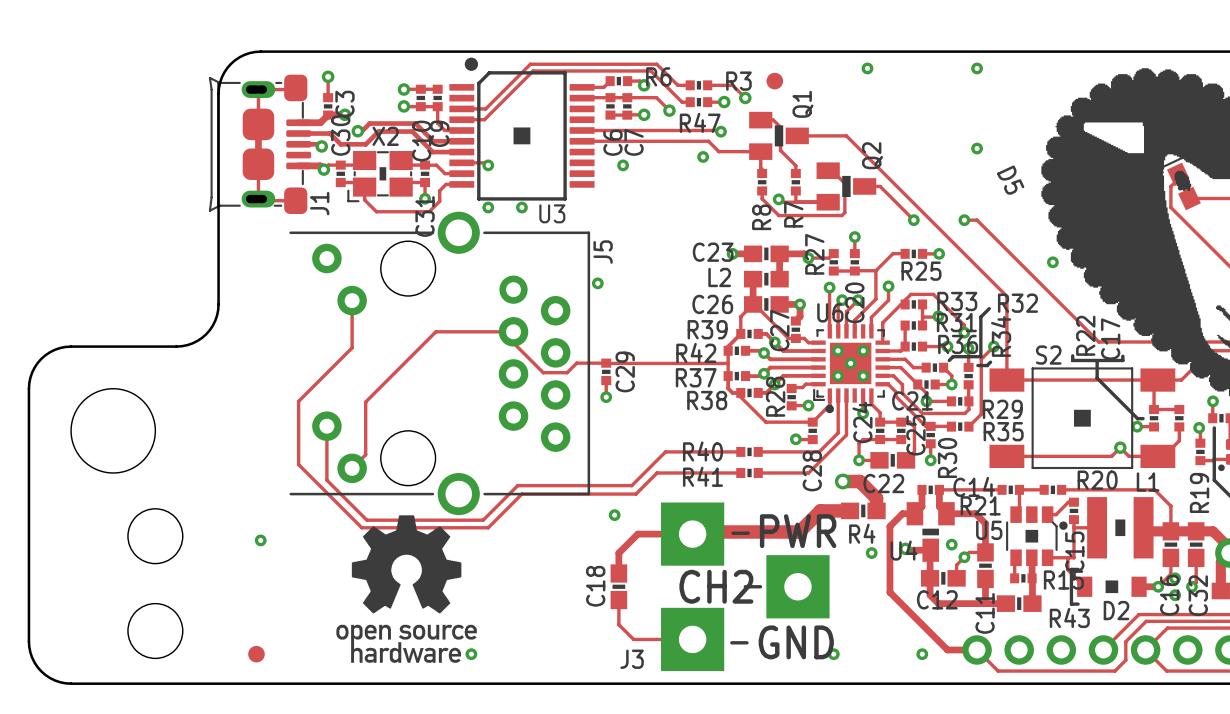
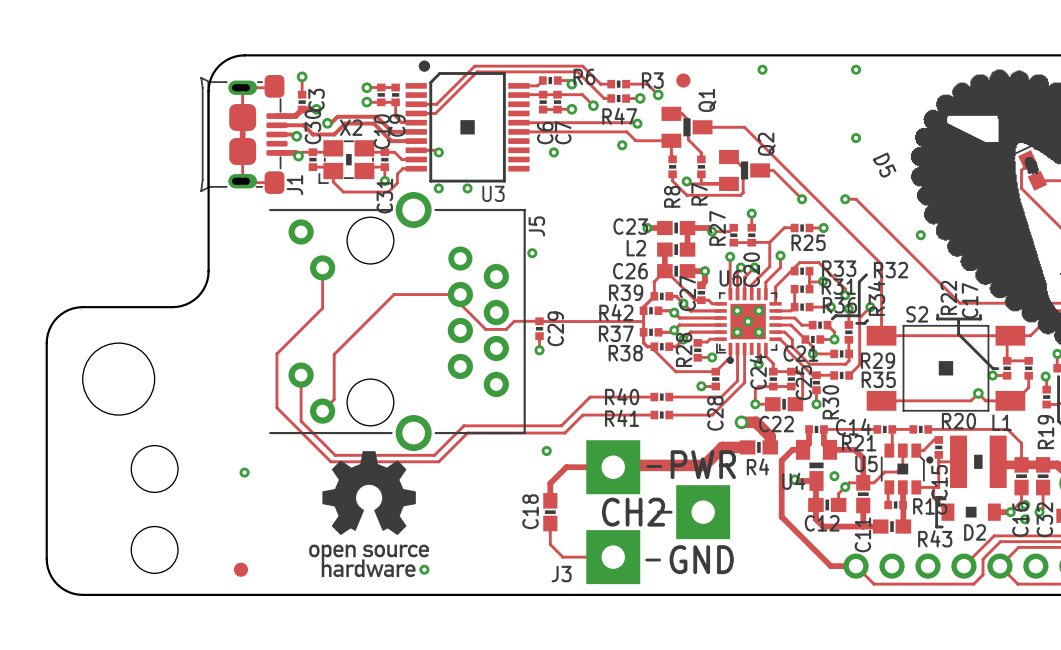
track: none -> (902, 450) (902, 466) (897, 472) (884, 472) (874, 482) (863, 482)
via: (871, 553) -> none
via: (833, 654) -> none
via: (922, 654) -> none

